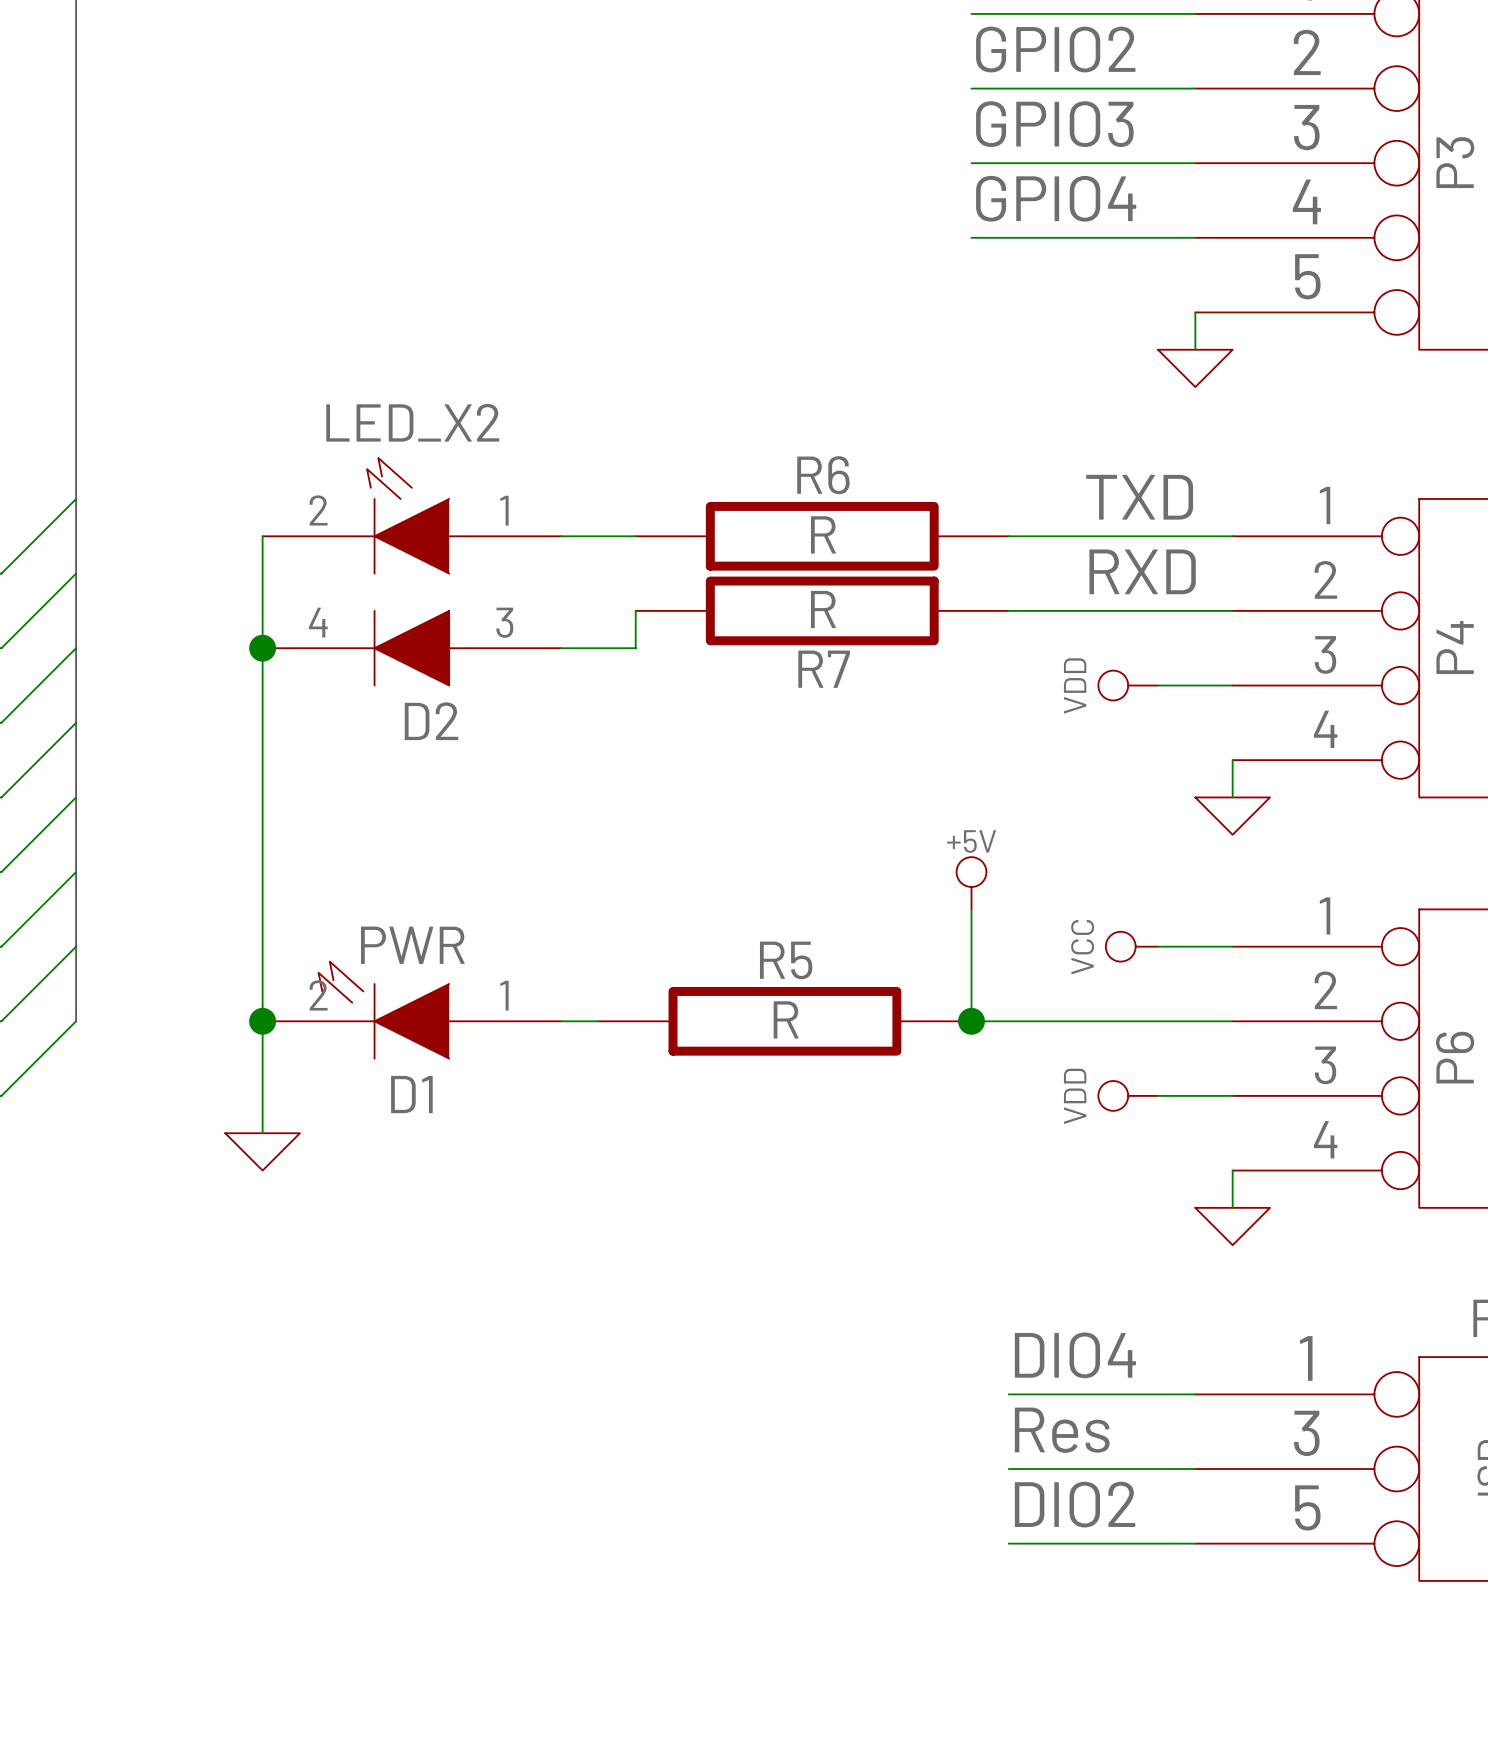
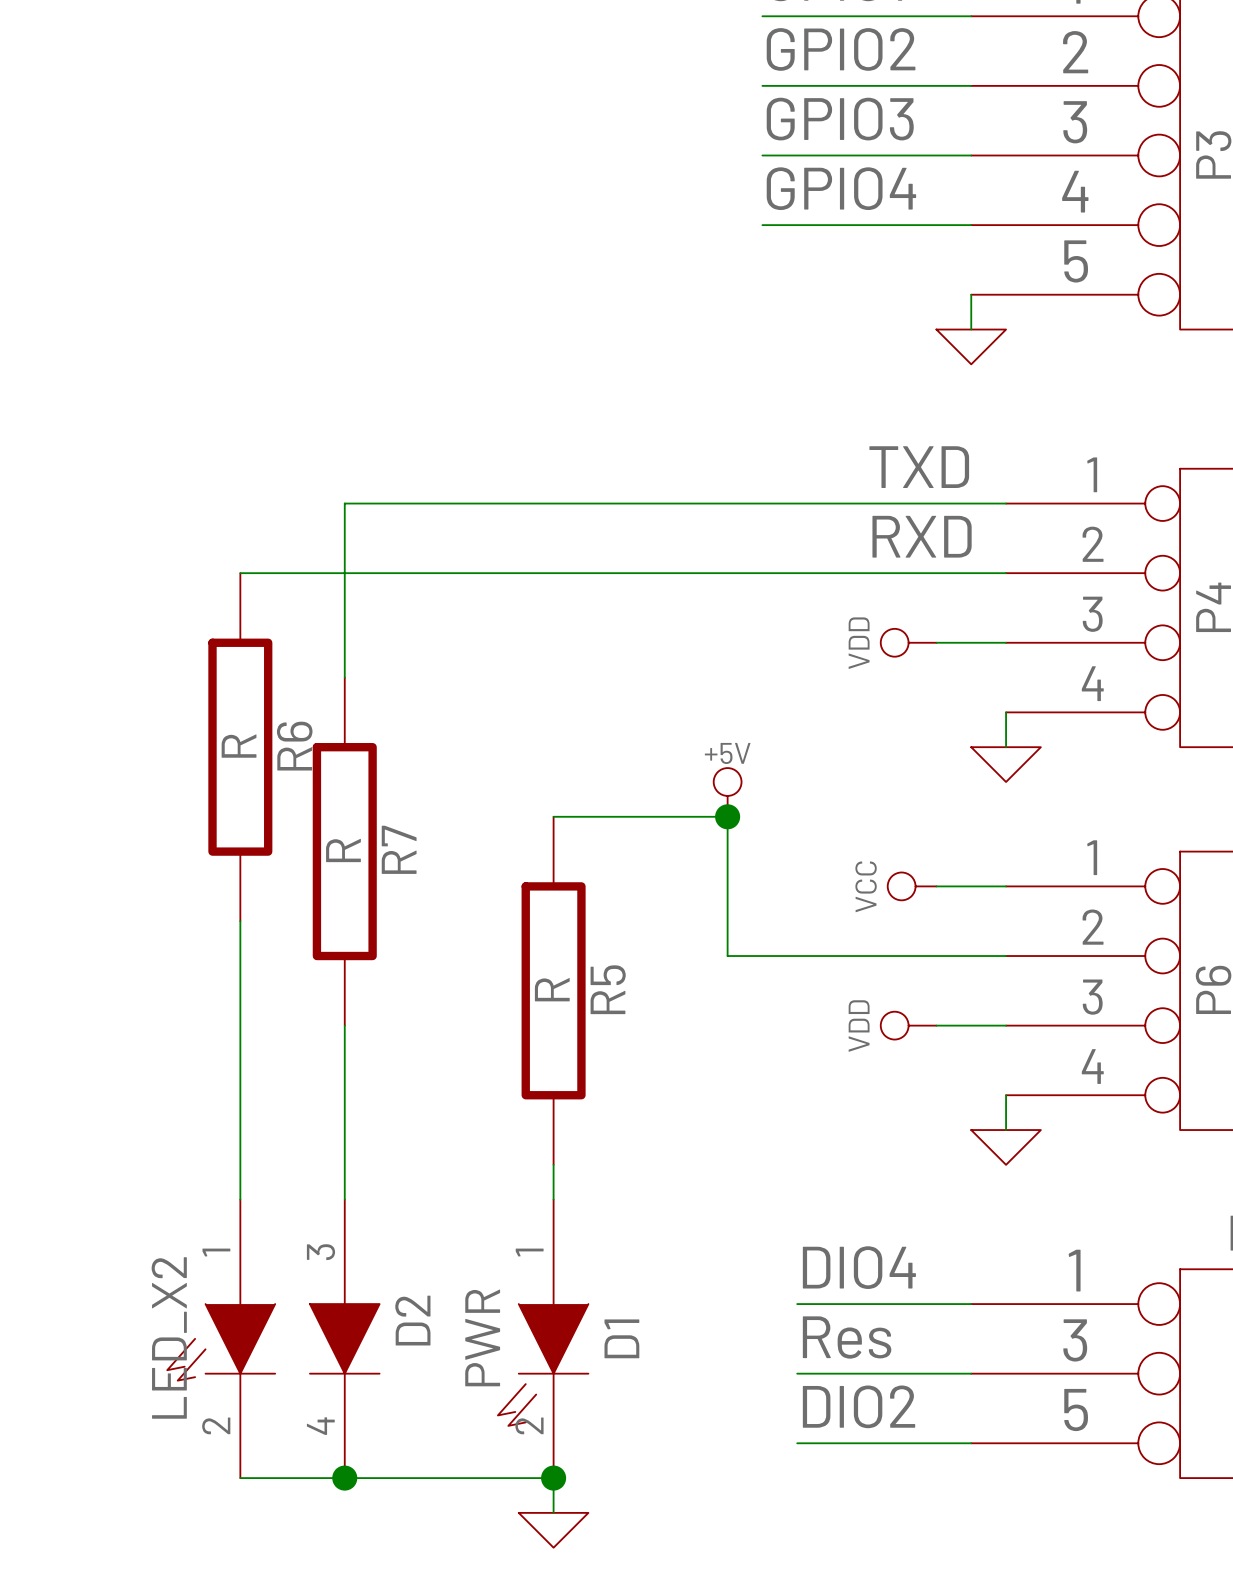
wire: (262, 536) (262, 1133) -> none
wire: none -> (379, 503) (344, 503) (344, 677)
wire: none -> (449, 503) (797, 503)
R6 rotation: 0° (822, 536) -> 90° clockwise (240, 747)
R6 position: (822, 536) -> (240, 747)
D2 rotation: 0° (408, 571) -> 90° counterclockwise (273, 1342)
D2 position: (411, 571) -> (273, 1338)
wire: none -> (240, 573) (797, 573)
wire: (635, 610) (635, 648) (561, 648) -> none
R7 rotation: 0° (822, 610) -> 90° clockwise (344, 851)
R7 position: (822, 610) -> (344, 851)
junction: (262, 648) -> none
R7 name position: R7 (824, 669) -> R7 (399, 849)
power symbol position: +5V (971, 883) -> +5V (727, 792)
wire: (971, 909) (971, 1021) -> (553, 816) (727, 816) (727, 956) (762, 956)
wire: none -> (240, 921) (240, 1199)
D1 rotation: 0° (383, 1010) -> 90° counterclockwise (543, 1364)
D1 position: (411, 1010) -> (543, 1338)
junction: (262, 1021) -> none
wire: (561, 1021) (598, 1021) -> none
R5 rotation: 0° (784, 1021) -> 90° clockwise (553, 990)
junction position: (971, 1021) -> (727, 816)
wire: none -> (344, 1025) (344, 1199)
power symbol position: (262, 1151) -> (553, 1530)
wire: none -> (553, 1164) (553, 1199)
wire: none -> (240, 1478) (553, 1478) (553, 1512)
junction: none -> (344, 1478)
junction: none -> (553, 1478)

